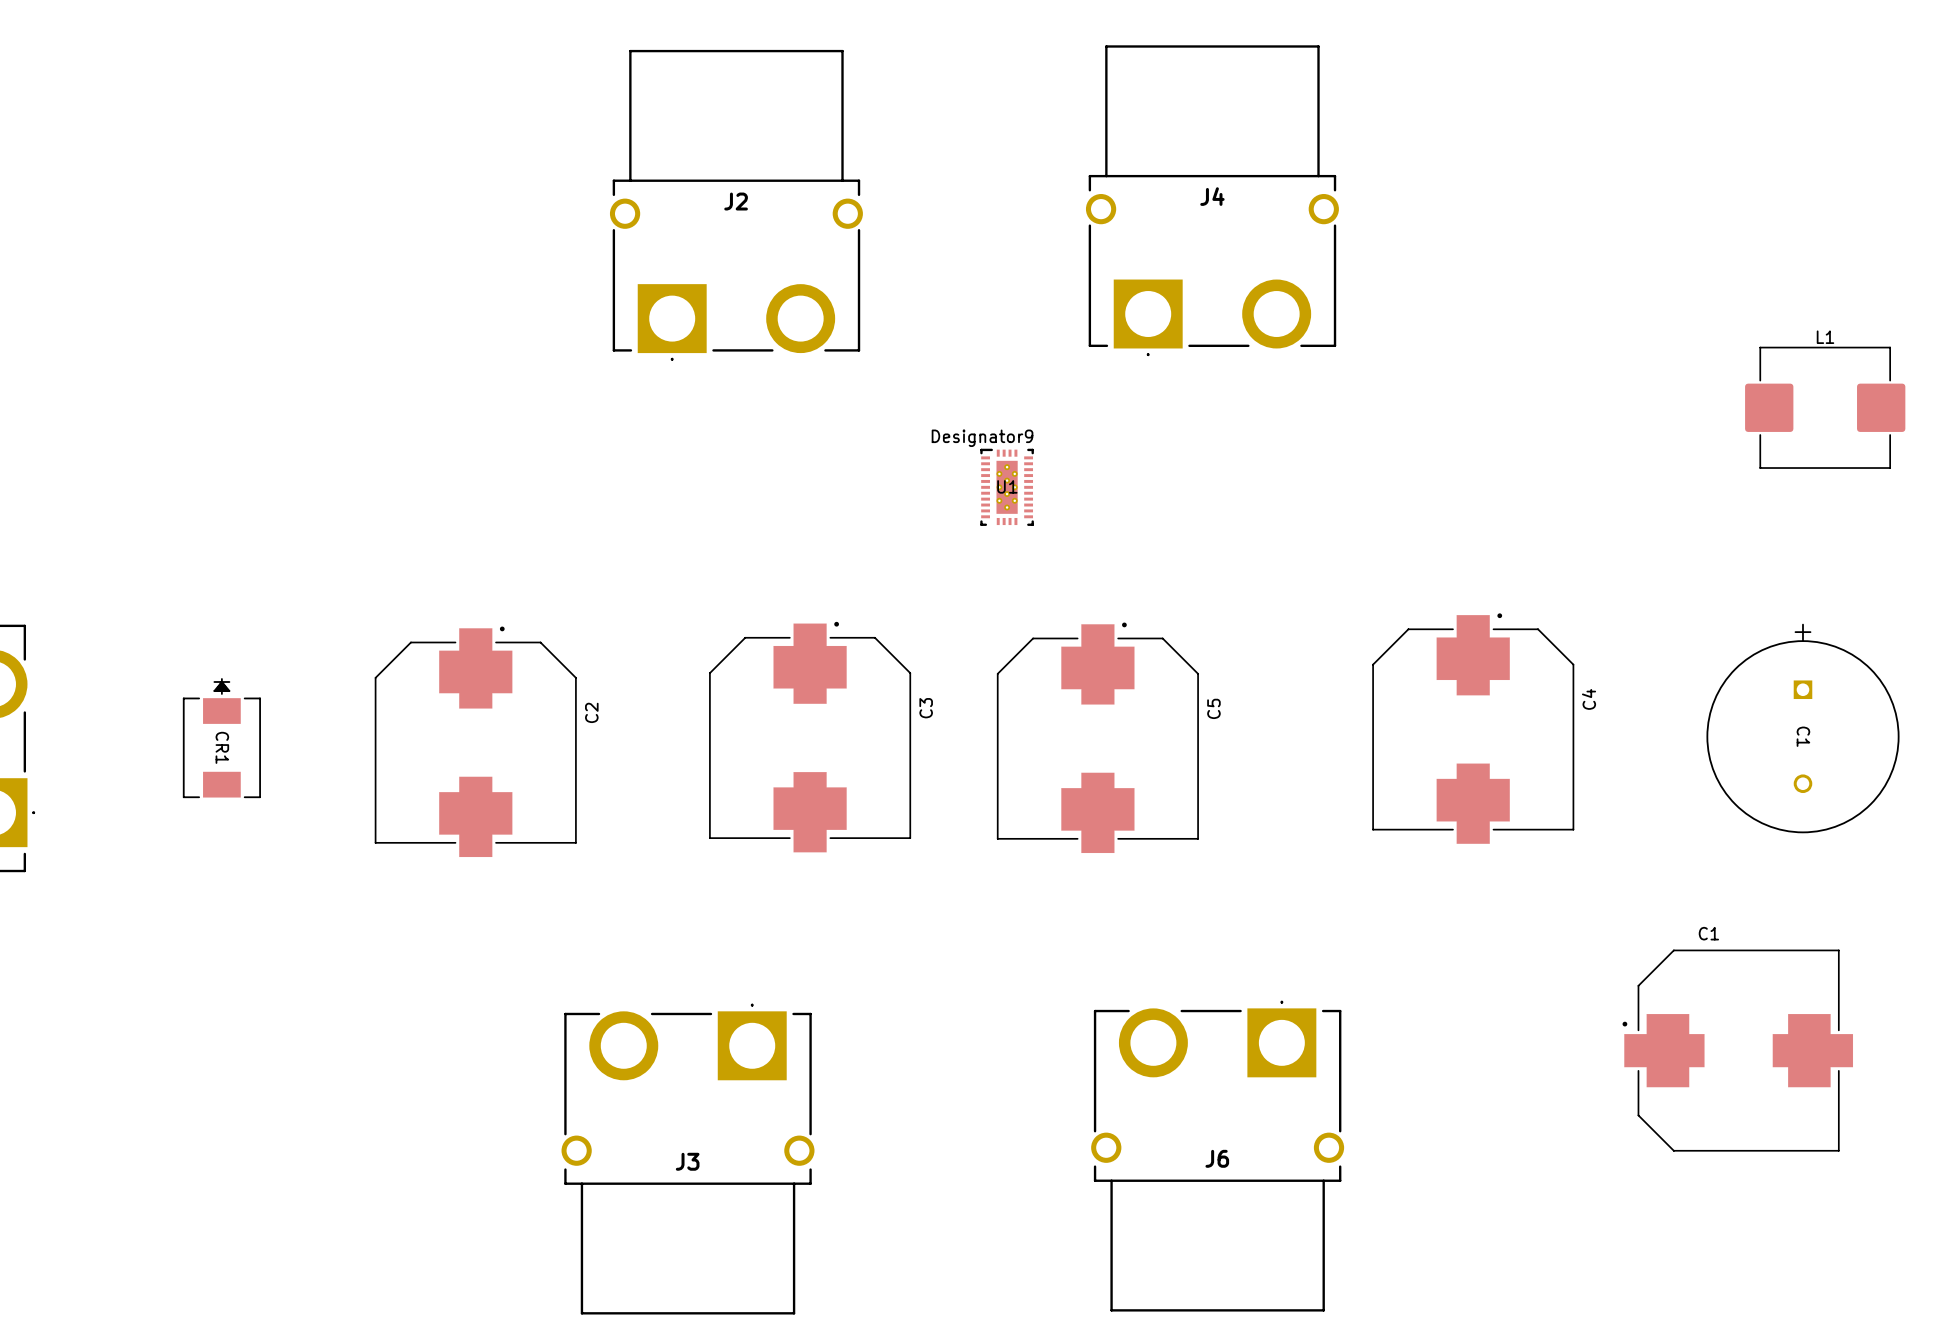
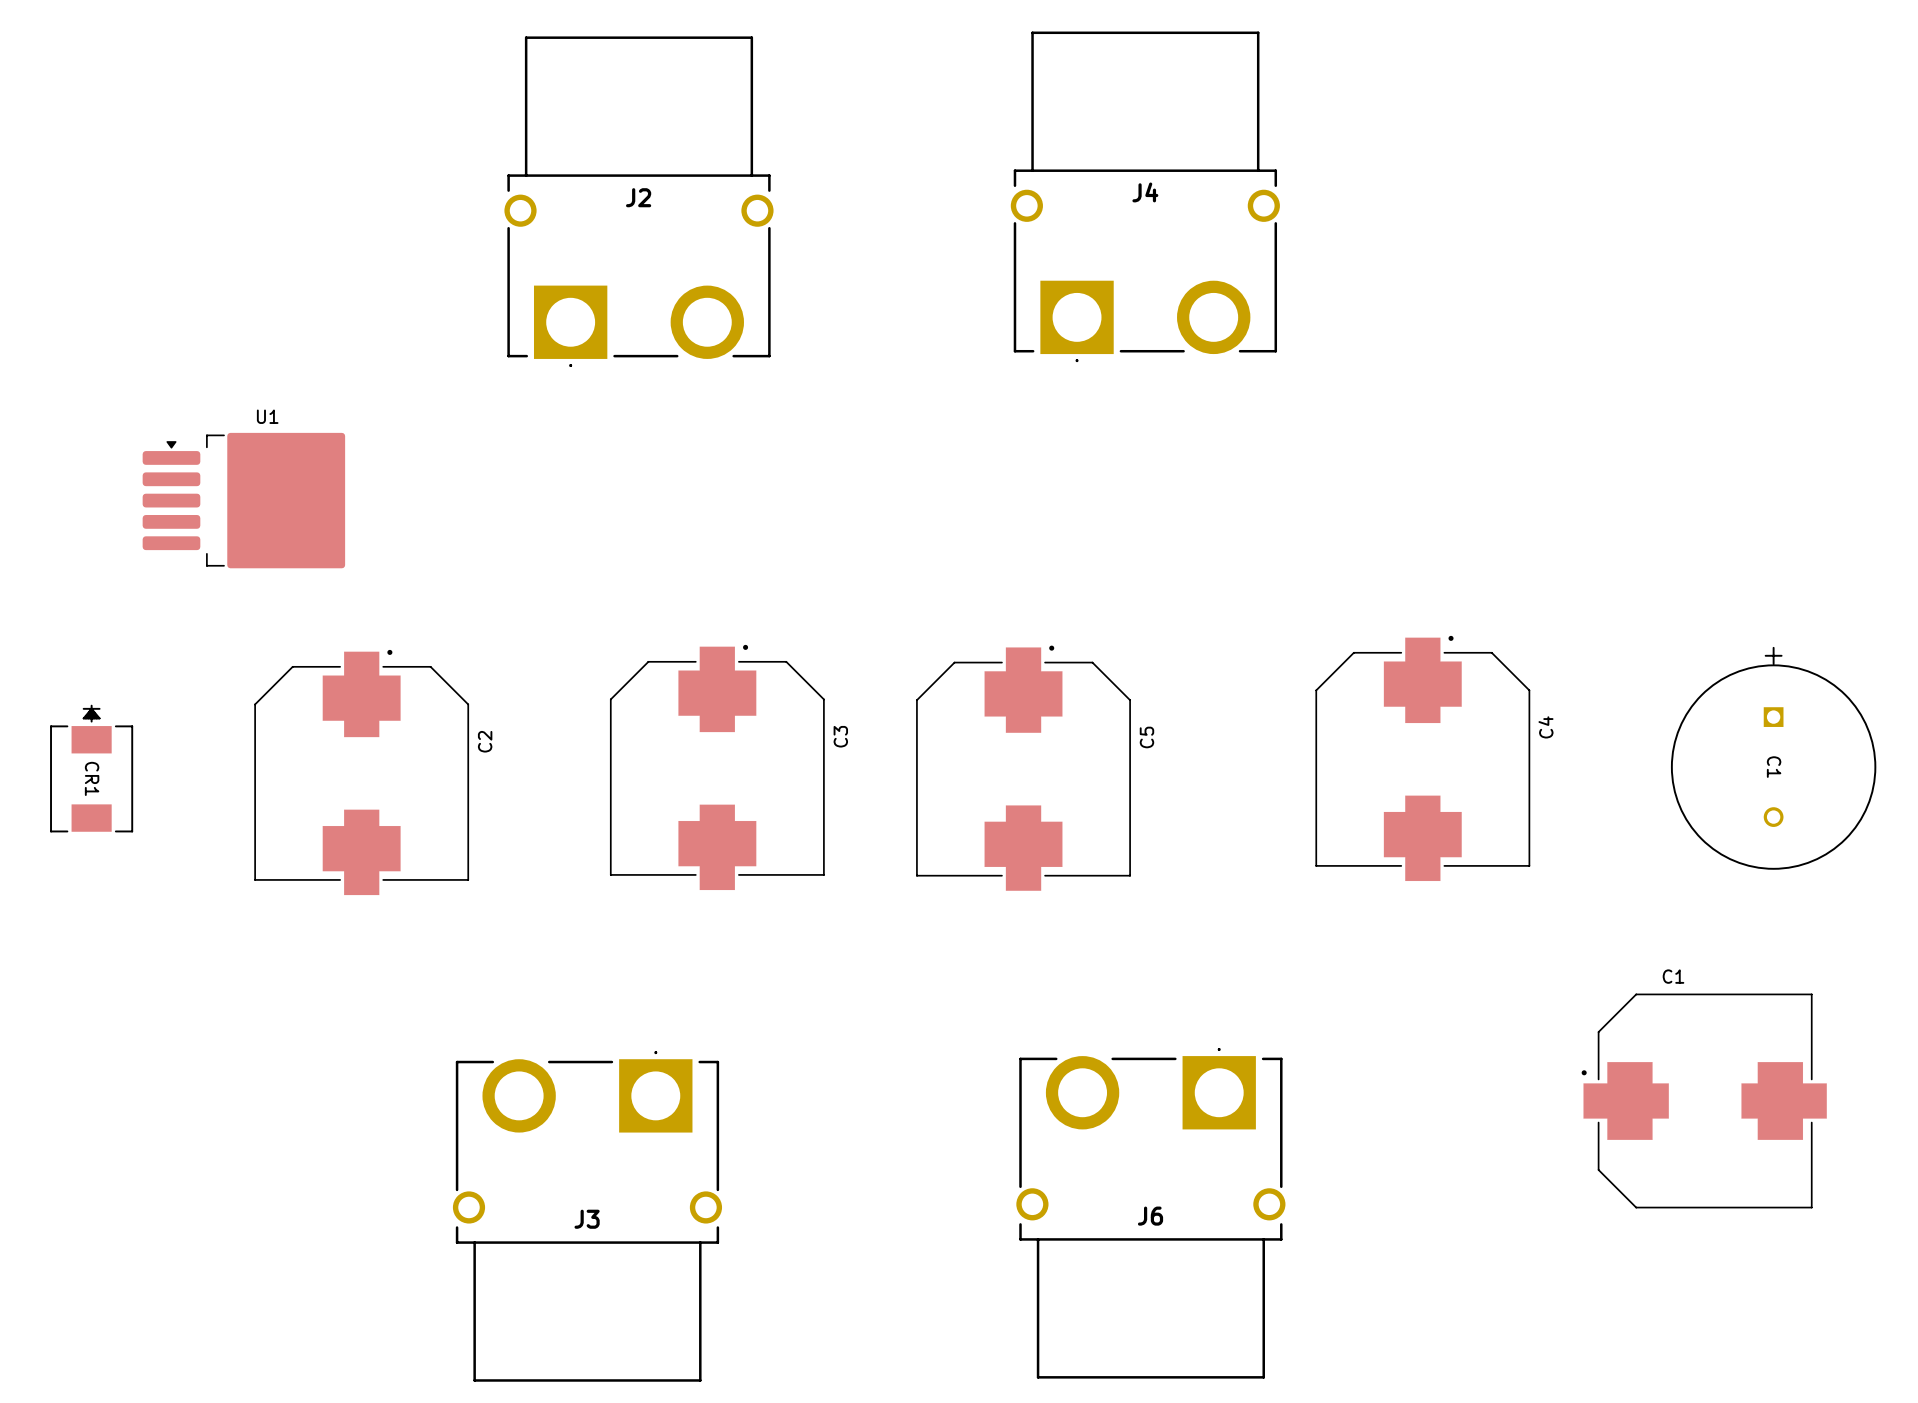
L1: (1825, 407) -> none
U1 footprint: [980, 448, 1034, 526] -> [142, 432, 346, 569]
U1 name position: U1 (1007, 486) -> U1 (267, 416)

